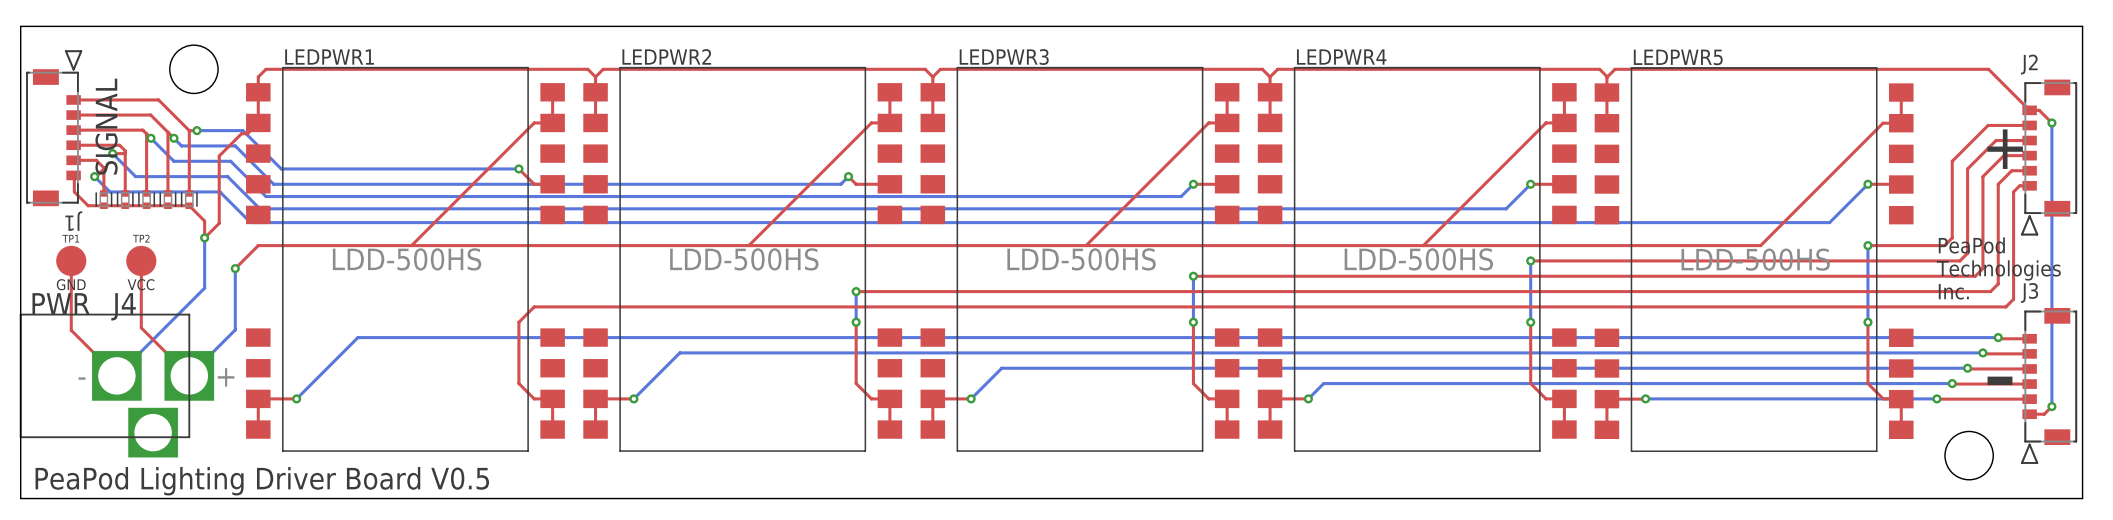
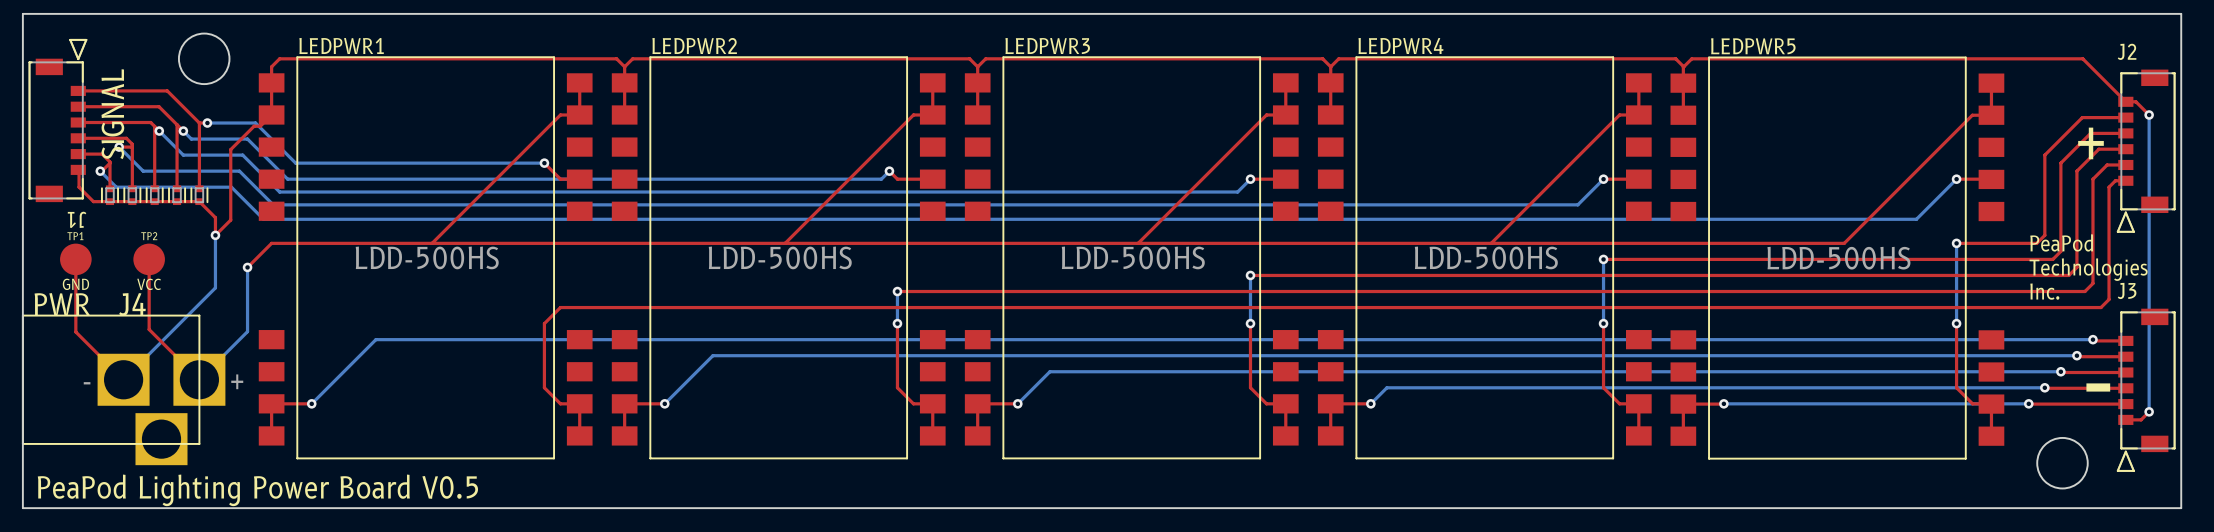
text: PeaPod Lighting Driver Board V0.5 (262, 481) -> PeaPod Lighting Power Board V0.5 (257, 490)

